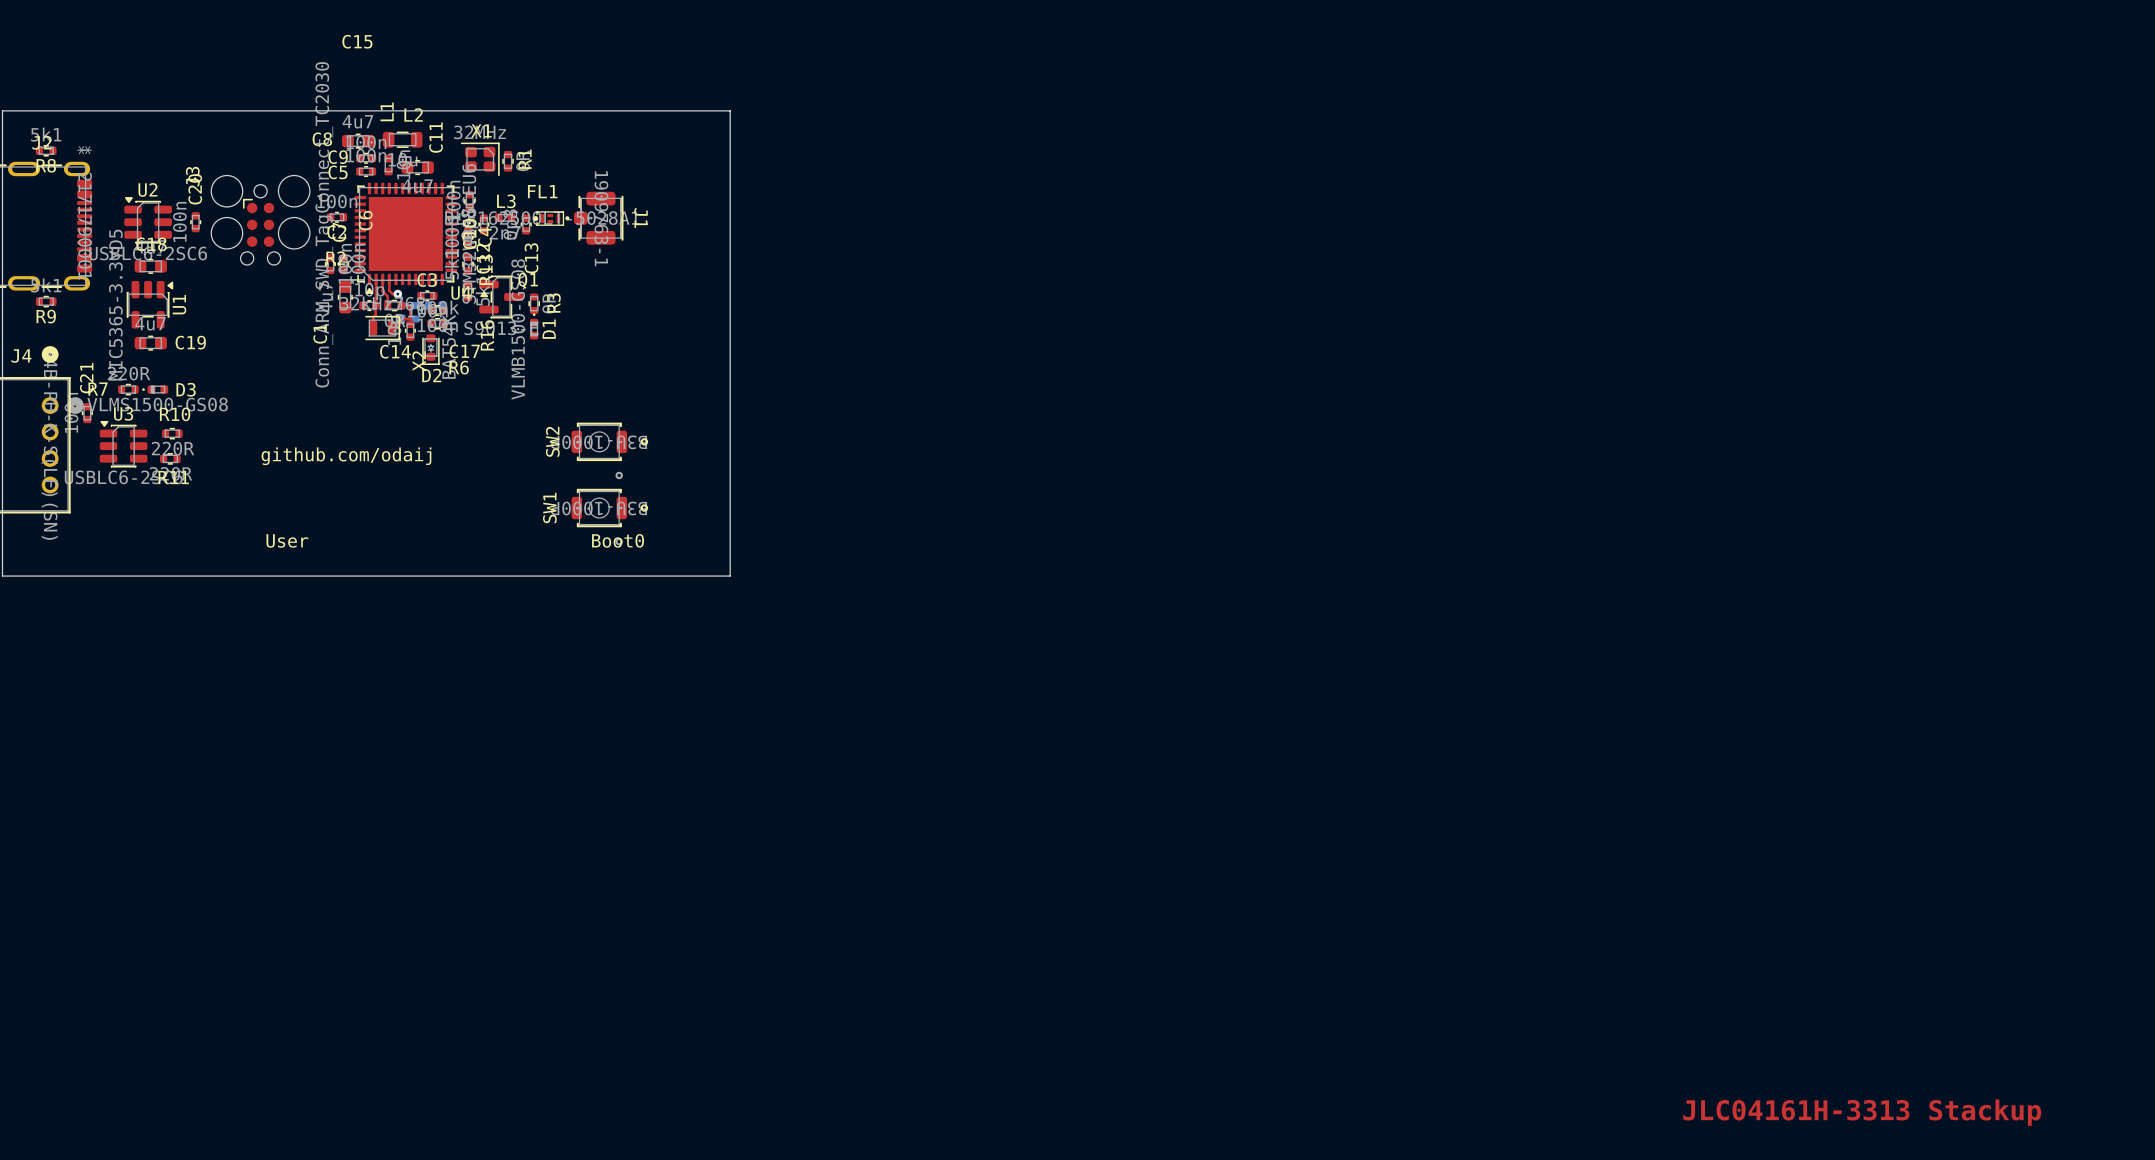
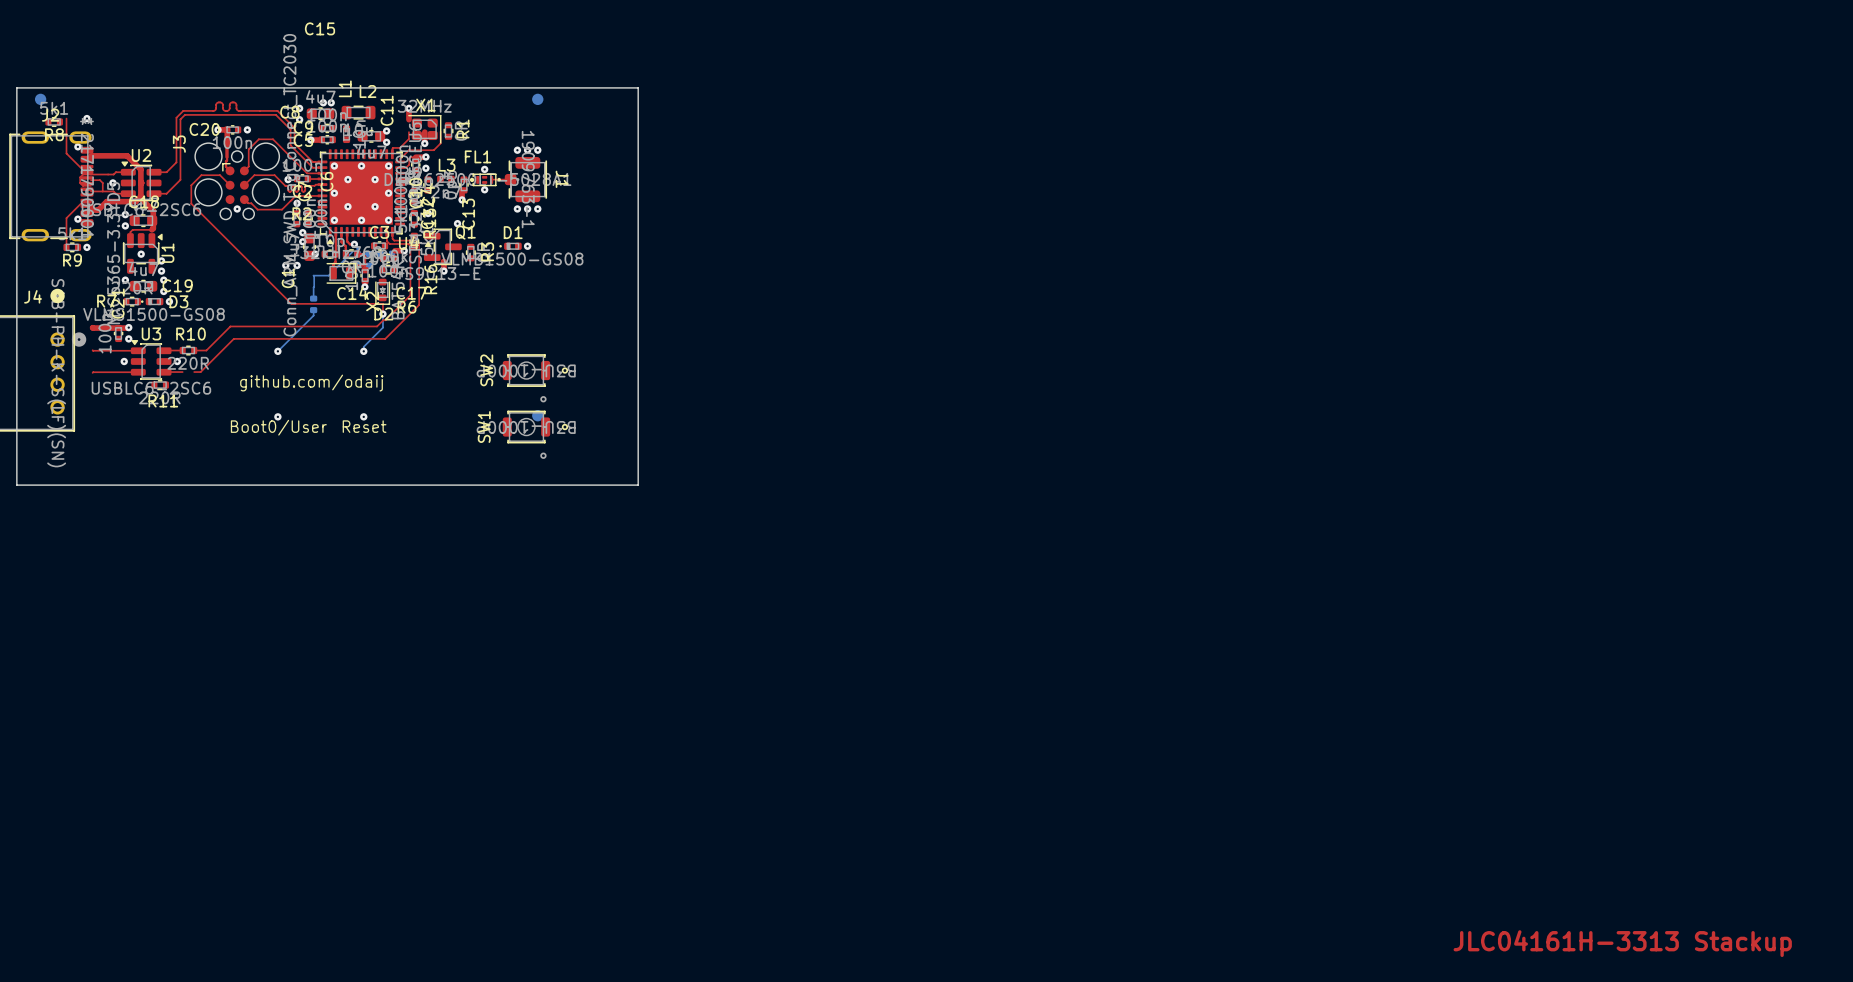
part: none -> (40, 99)
part: none -> (537, 99)
via: none -> (323, 102)
via: none -> (331, 102)
via: none -> (299, 108)
top track: none -> (408, 108) (408, 119)
via: none -> (408, 108)
top track: none -> (66, 118) (66, 153) (81, 168) (90, 168)
via: none -> (86, 118)
via: none -> (299, 119)
top track: none -> (218, 129) (227, 129) (227, 144)
via: none -> (218, 129)
via: none -> (247, 129)
via: none -> (386, 131)
top track: none -> (408, 132) (408, 138) (399, 147) (393, 147) (392, 154)
top track: none -> (424, 132) (424, 143)
top track: none -> (440, 131) (440, 143) (433, 150) (408, 150) (400, 158) (400, 162)
top track: none -> (310, 140) (320, 140)
via: none -> (310, 140)
via: none -> (386, 142)
via: none -> (424, 143)
top track: none -> (226, 144) (226, 156)
via: none -> (77, 146)
via: none -> (517, 150)
via: none -> (527, 150)
via: none -> (537, 150)
C20 name position: C20 (195, 189) -> C20 (204, 129)
top track: none -> (90, 155) (127, 155) (140, 169) (140, 198) (153, 210) (153, 228) (132, 229) (130, 232) (130, 240)
top track: none -> (227, 157) (226, 166) (230, 170)
top track: none -> (425, 156) (410, 157) (409, 164) (406, 167) (400, 167)
via: none -> (425, 156)
top track: none -> (322, 162) (312, 162) (294, 143) (294, 127) (277, 110) (238, 110) (233, 102) (230, 103) (228, 110) (225, 110) (222, 103) (218, 102) (214, 110) (183, 110) (176, 117) (176, 162) (166, 172) (152, 172)
via: none -> (334, 166)
via: none -> (361, 166)
via: none -> (388, 166)
top track: none -> (322, 167) (312, 167) (290, 145) (290, 129) (275, 114) (184, 114) (180, 119) (180, 179) (166, 193) (152, 193)
via: none -> (425, 168)
via: none -> (484, 169)
top track: none -> (244, 170) (248, 166) (248, 149) (258, 139) (273, 139) (307, 173) (322, 173)
top track: none -> (127, 172) (115, 172) (113, 174) (82, 174) (80, 177) (80, 182) (82, 185) (90, 185)
top track: none -> (322, 179) (308, 179)
top track: none -> (90, 180) (99, 180) (102, 182) (102, 191)
via: none -> (288, 179)
via: none -> (347, 179)
via: none -> (375, 179)
top track: none -> (491, 179) (510, 179)
via: none -> (112, 182)
C20 rotation: 0° (195, 222) -> 90° clockwise (232, 129)
C20 position: (195, 222) -> (232, 129)
top track: none -> (230, 185) (220, 175) (201, 175) (191, 185) (191, 203) (291, 303) (382, 303) (382, 314)
top track: none -> (322, 184) (306, 185) (303, 191) (301, 185) (298, 186) (296, 191) (292, 185) (289, 191) (287, 186) (274, 175) (254, 175) (244, 185)
via: none -> (484, 189)
top track: none -> (462, 190) (462, 199)
top track: none -> (90, 191) (127, 193)
via: none -> (334, 193)
via: none -> (388, 193)
top track: none -> (140, 196) (135, 201) (106, 201) (98, 210) (90, 210)
top track: none -> (322, 195) (295, 195) (282, 209) (257, 209) (244, 199)
via: none -> (462, 199)
top track: none -> (90, 202) (81, 202) (66, 218) (66, 247)
via: none -> (297, 203)
via: none -> (347, 206)
via: none -> (375, 206)
via: none -> (237, 208)
via: none -> (517, 208)
via: none -> (527, 208)
via: none -> (537, 208)
via: none -> (428, 213)
via: none -> (125, 214)
via: none -> (77, 219)
via: none -> (334, 220)
via: none -> (361, 220)
via: none -> (388, 220)
via: none -> (457, 223)
via: none -> (125, 225)
top track: none -> (386, 231) (386, 241) (389, 243) (408, 243) (410, 245) (410, 295) (377, 326) (230, 326) (206, 350) (194, 350)
top track: none -> (392, 231) (394, 240) (416, 240) (419, 242) (419, 305) (385, 338) (233, 338) (200, 372) (194, 372)
via: none -> (302, 232)
via: none -> (302, 241)
via: none -> (527, 246)
via: none -> (86, 247)
R9 position: (46, 301) -> (72, 247)
top track: none -> (394, 250) (404, 250)
via: none -> (404, 250)
bottom track: none -> (352, 251) (328, 275) (313, 275) (313, 298)
via: none -> (141, 254)
via: none -> (315, 254)
via: none -> (161, 260)
top track: none -> (443, 261) (443, 271)
via: none -> (285, 265)
via: none -> (297, 265)
via: none -> (161, 271)
via: none -> (443, 271)
D1 rotation: 0° (534, 326) -> 90° counterclockwise (510, 246)
D1 position: (534, 326) -> (510, 246)
via: none -> (125, 280)
via: none -> (163, 280)
via: none -> (364, 286)
via: none -> (163, 291)
via: none -> (169, 301)
part: none -> (313, 304)
bottom track: none -> (313, 310) (313, 315) (277, 351)
bottom track: none -> (382, 314) (382, 327) (363, 346) (363, 351)
via: none -> (382, 314)
R7 position: (128, 389) -> (132, 301)
D3 position: (155, 389) -> (152, 301)
top track: none -> (92, 327) (128, 327)
via: none -> (128, 327)
via: none -> (128, 338)
C21 position: (87, 413) -> (118, 333)
top track: none -> (92, 350) (138, 350)
top track: none -> (182, 350) (164, 350)
via: none -> (277, 351)
via: none -> (363, 351)
via: none -> (124, 361)
via: none -> (177, 361)
R10 position: (172, 433) -> (188, 350)
top track: none -> (138, 372) (92, 372)
top track: none -> (182, 372) (164, 372)
U3 position: (123, 444) -> (151, 359)
part: none -> (537, 415)
via: none -> (277, 416)
via: none -> (363, 416)
text: none -> Reset (364, 426)
text: none -> Boot0/User (278, 427)
text: User (287, 540) -> none
text: Boot0 (618, 540) -> none

